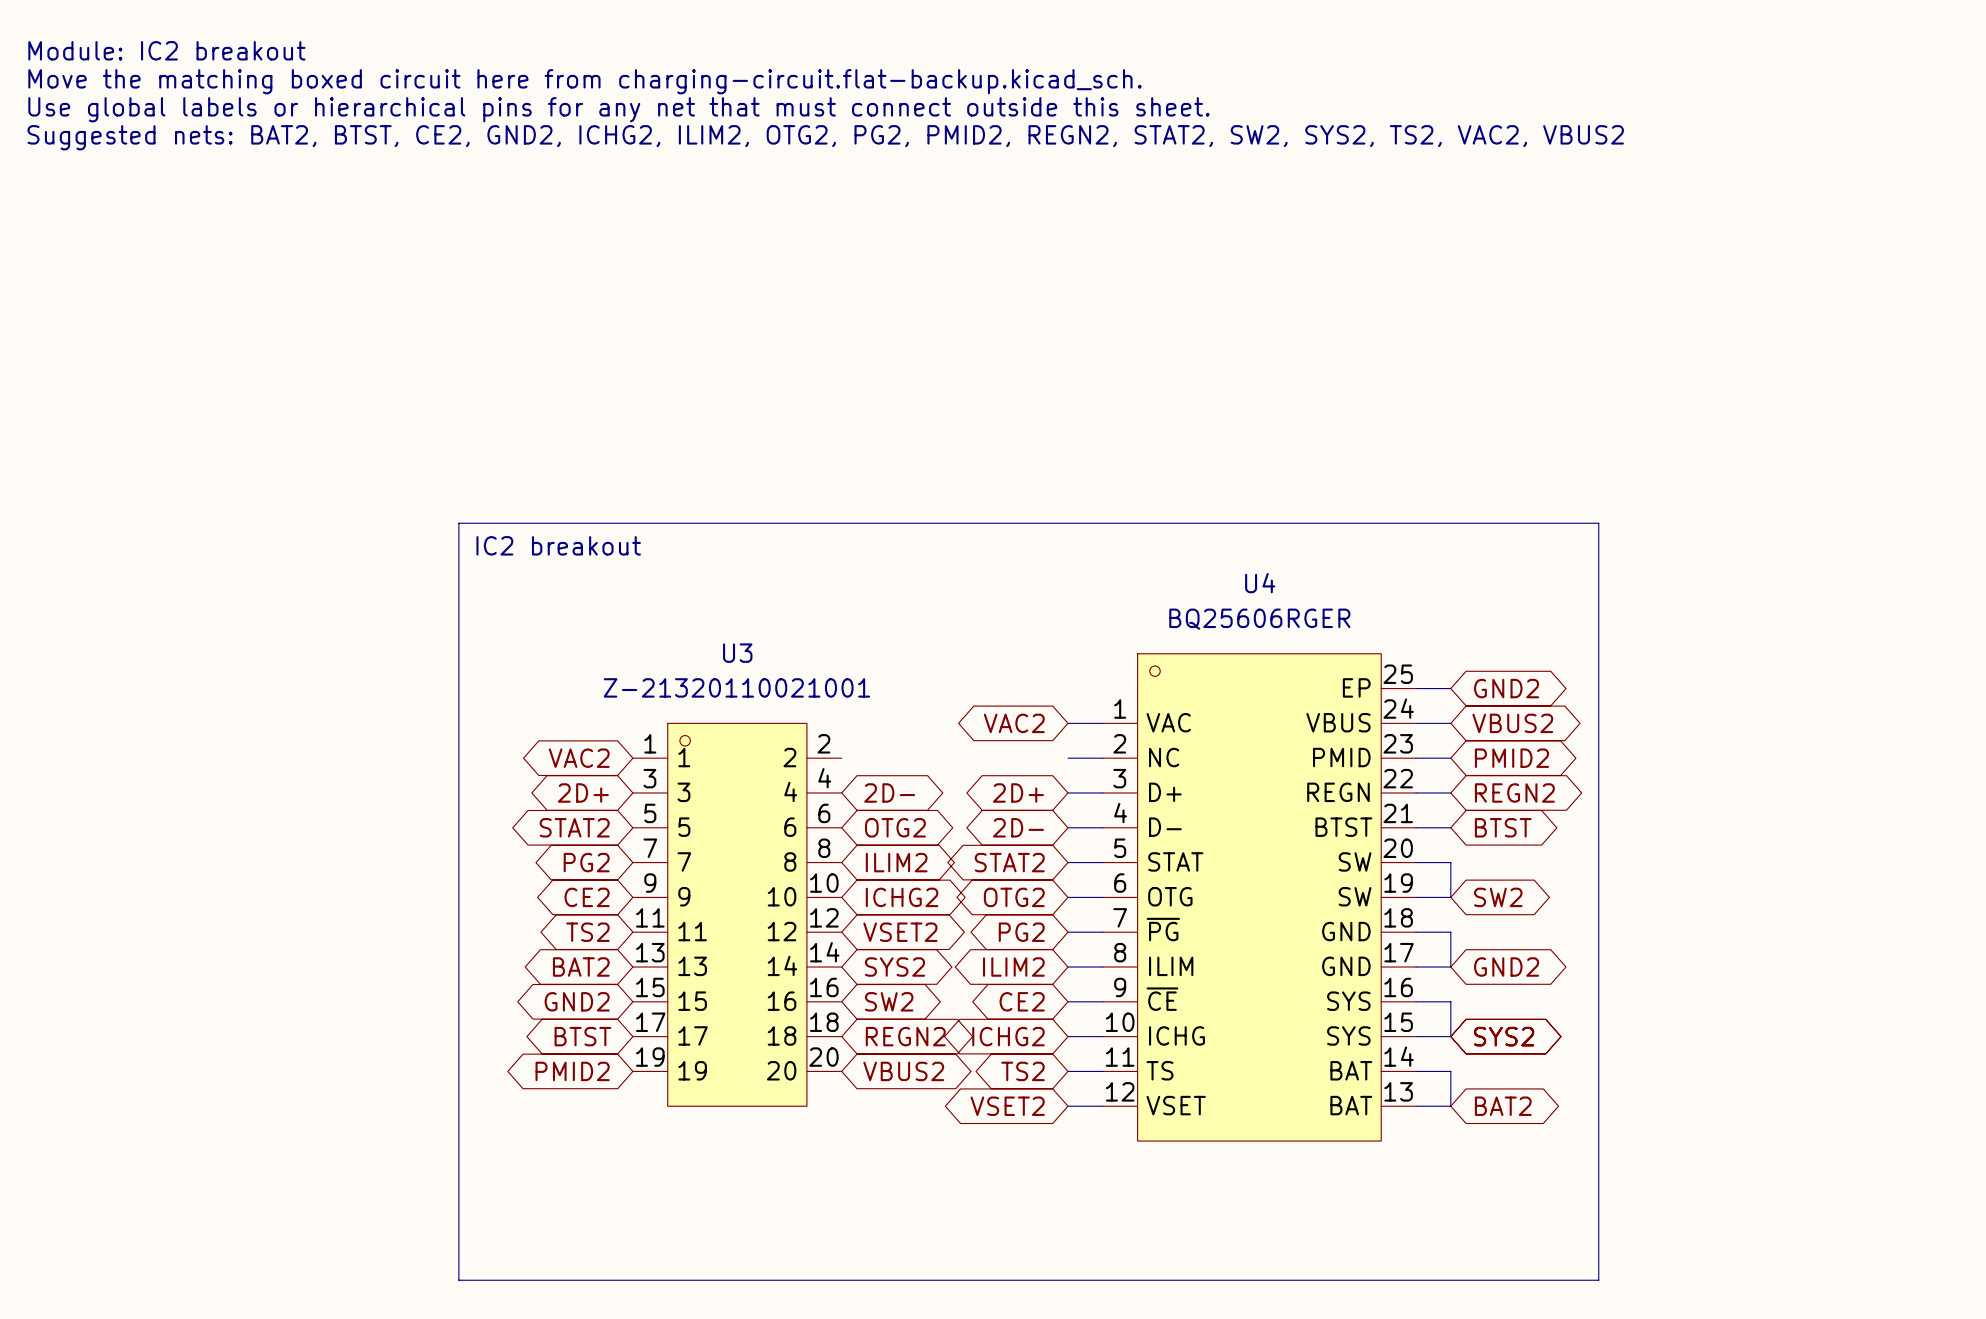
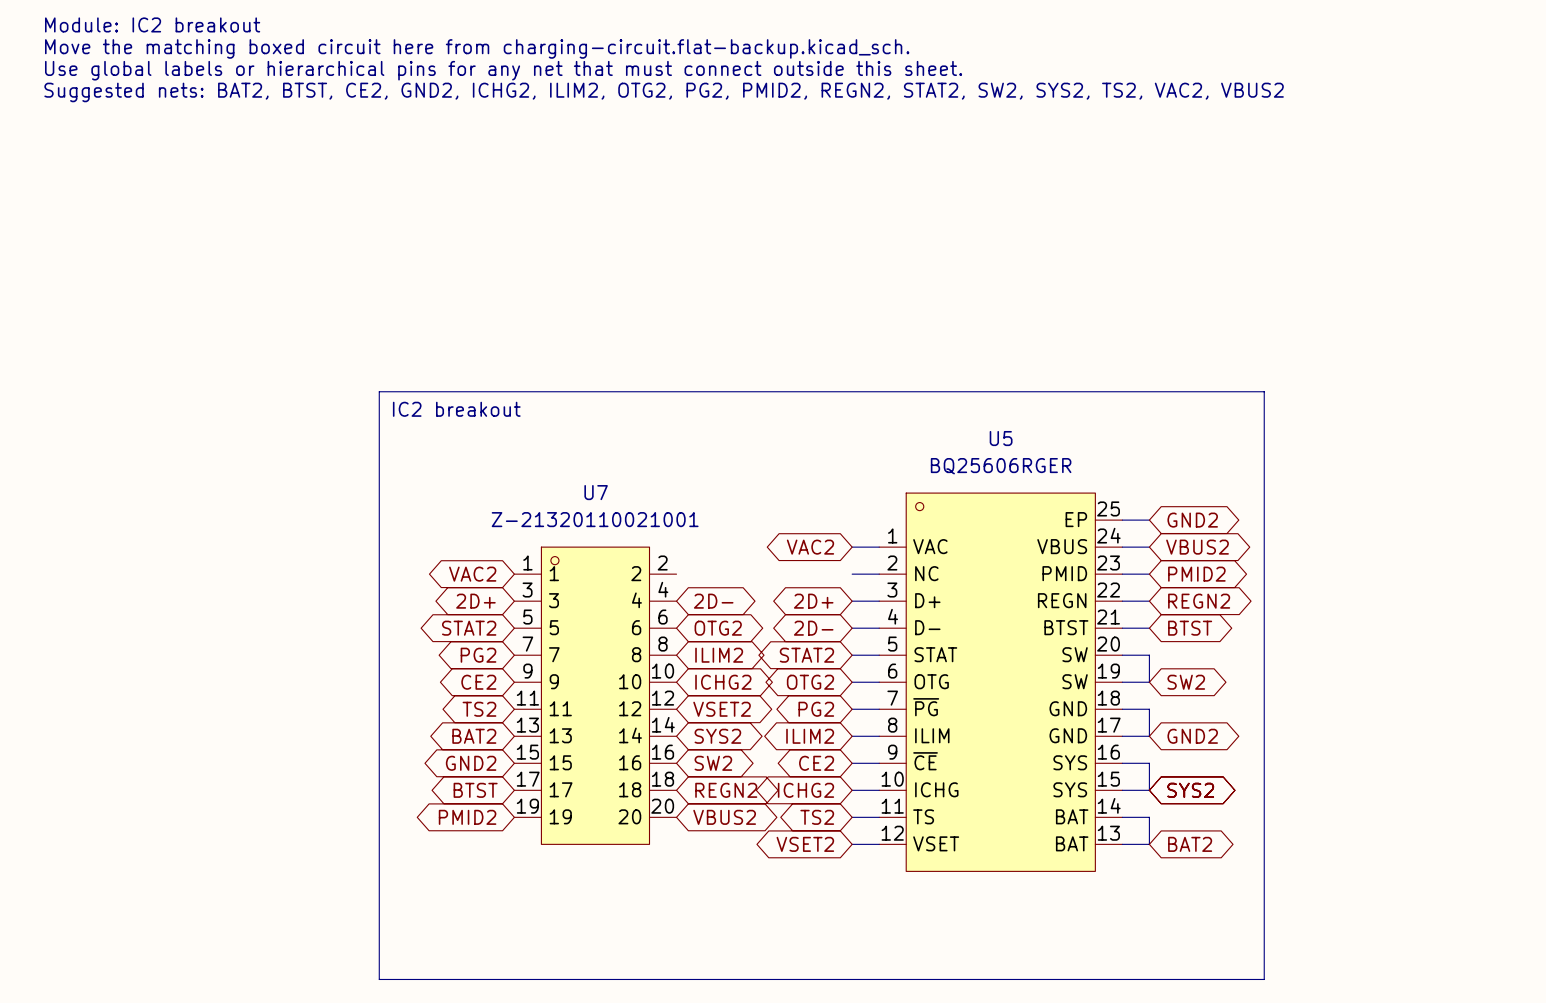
U4 name: U4 (1260, 583) -> U5 (1001, 438)
U3 name: U3 (737, 653) -> U7 (596, 492)

